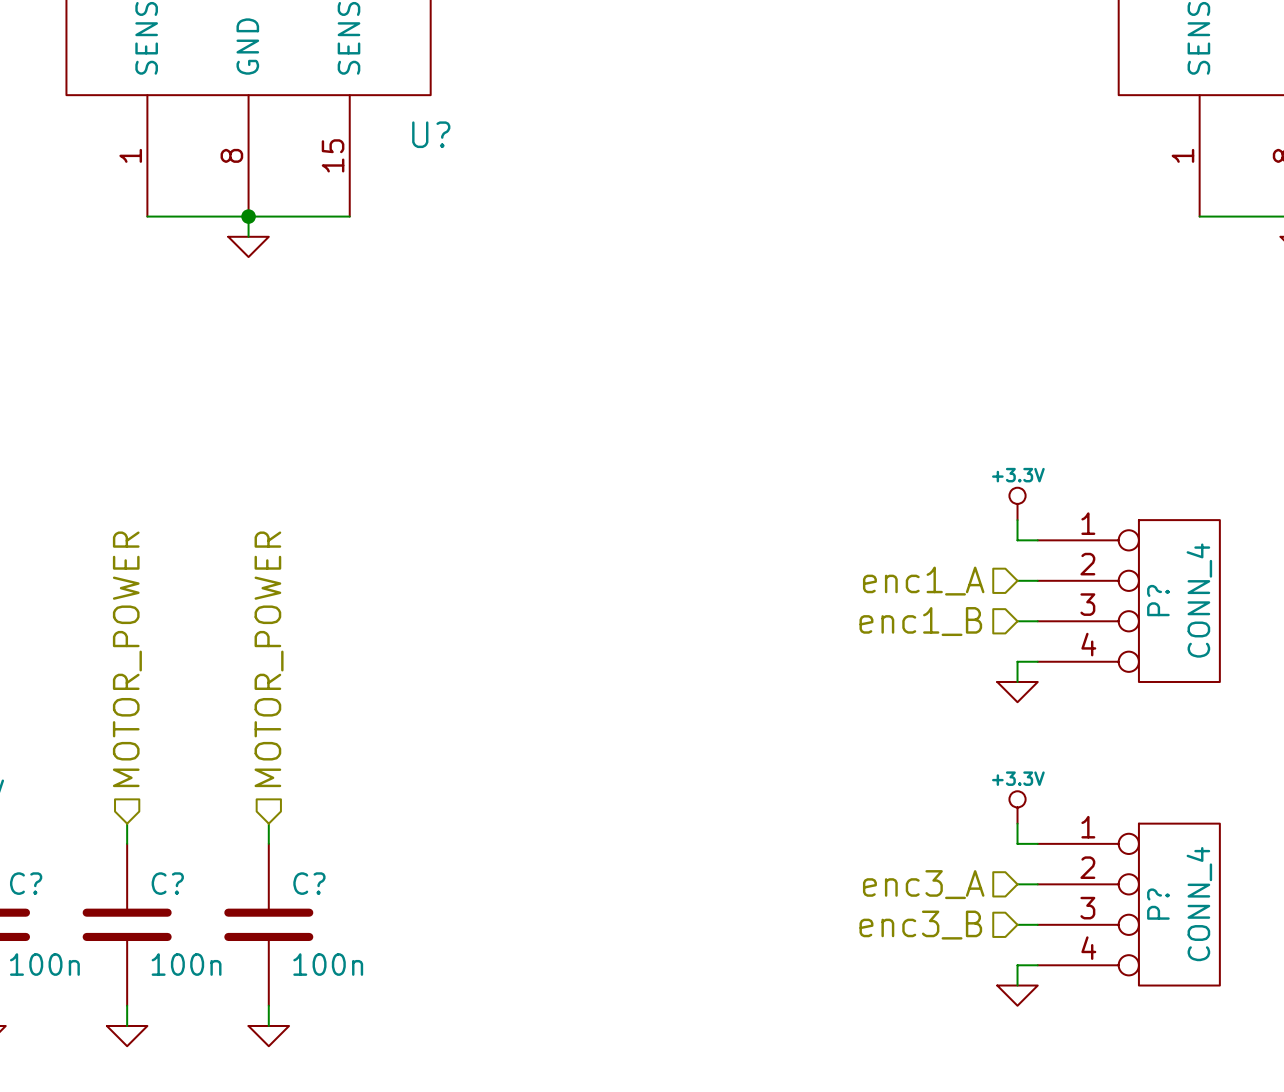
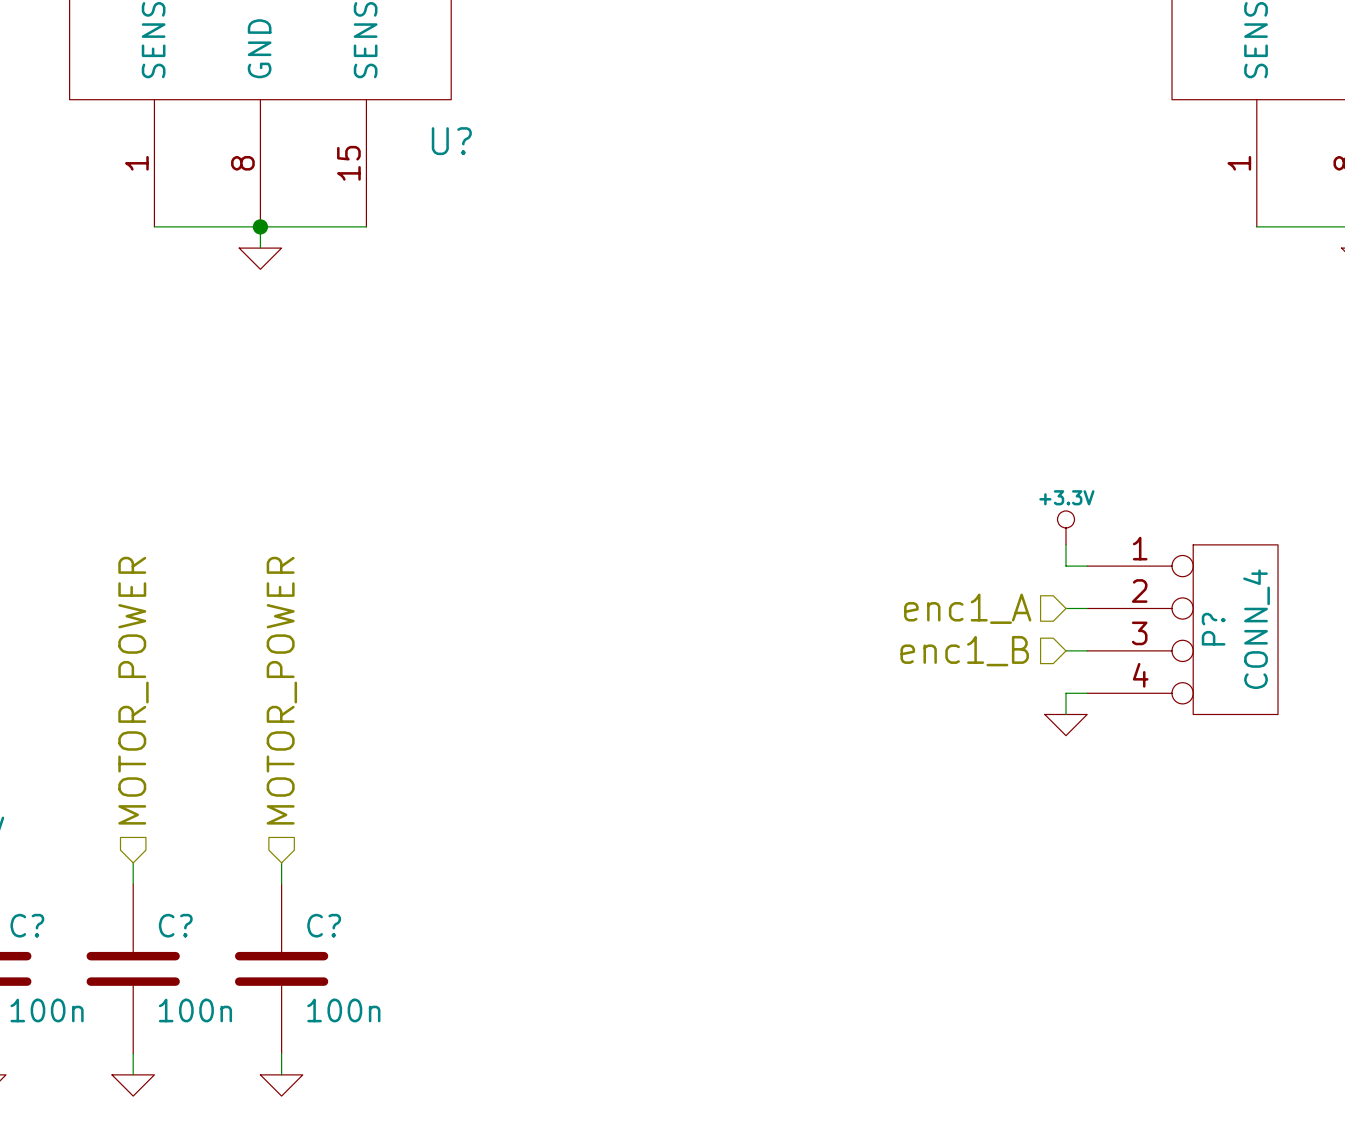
power symbol: +3.3V (1017, 807) -> none
wire: (1017, 823) (1017, 843) (1037, 843) -> none
hierarchical label: enc3_A (923, 884) -> none
wire: (1017, 884) (1037, 884) -> none
P?: CONN_4 (1128, 904) -> none
wire: (1017, 924) (1037, 924) -> none
hierarchical label: enc3_B (920, 925) -> none
wire: (1037, 965) (1017, 965) (1017, 985) -> none
power symbol: (1017, 995) -> none

